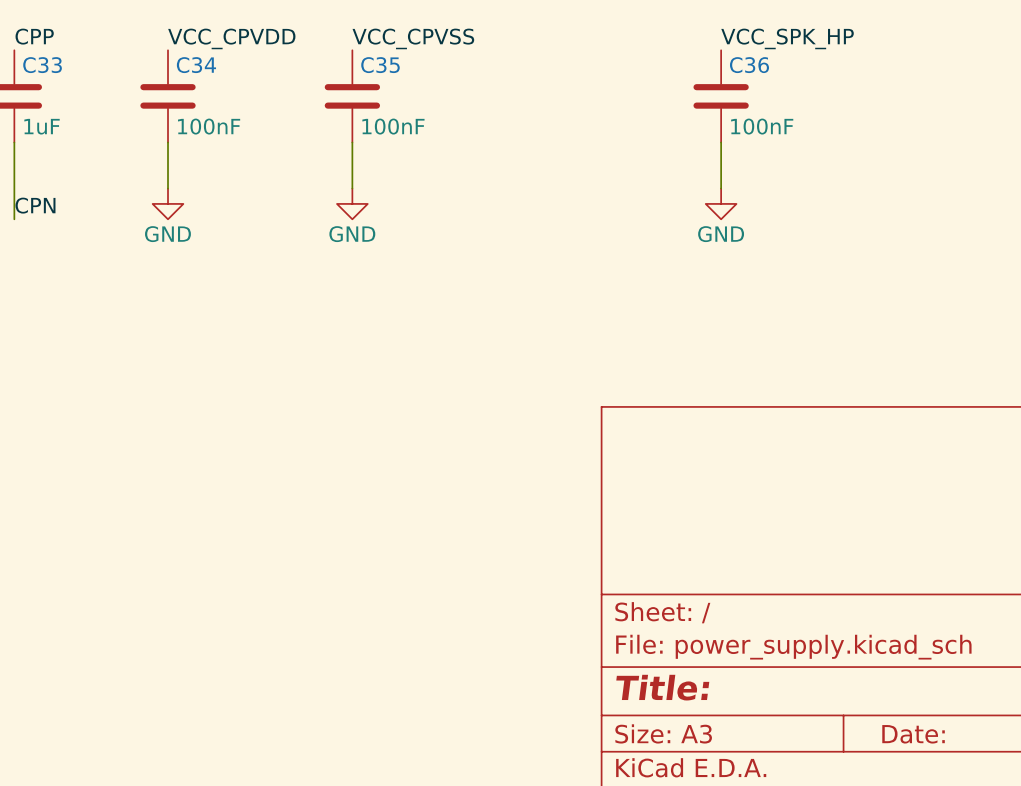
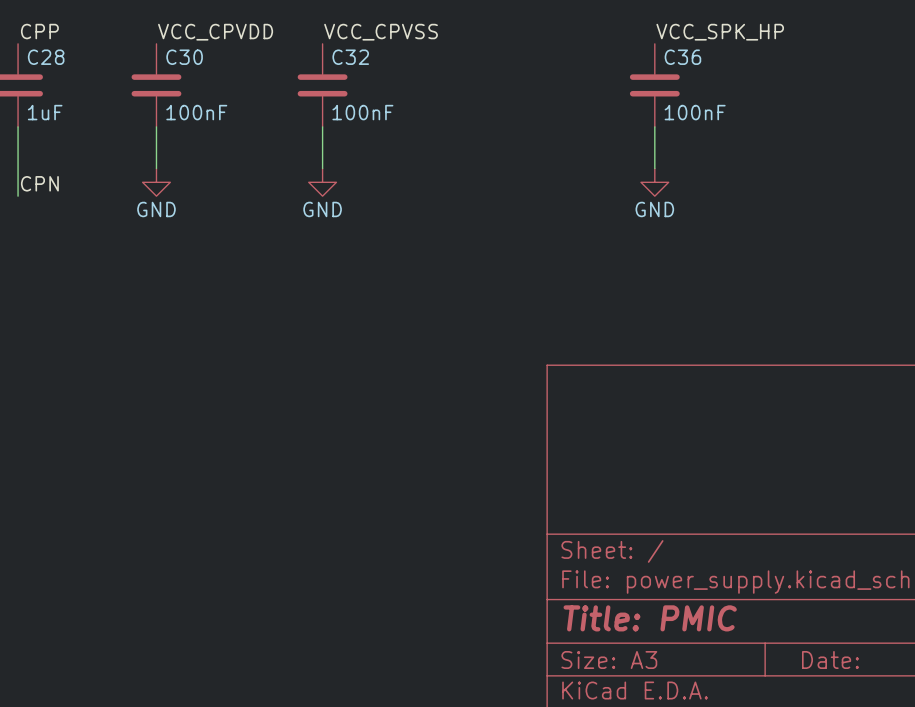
C33 name: C33 (42, 65) -> C28 (46, 57)
C34 name: C34 (196, 65) -> C30 (184, 57)
C35 name: C35 (380, 65) -> C32 (350, 57)
title block: Title: (662, 687) -> Title: PMIC (650, 618)

